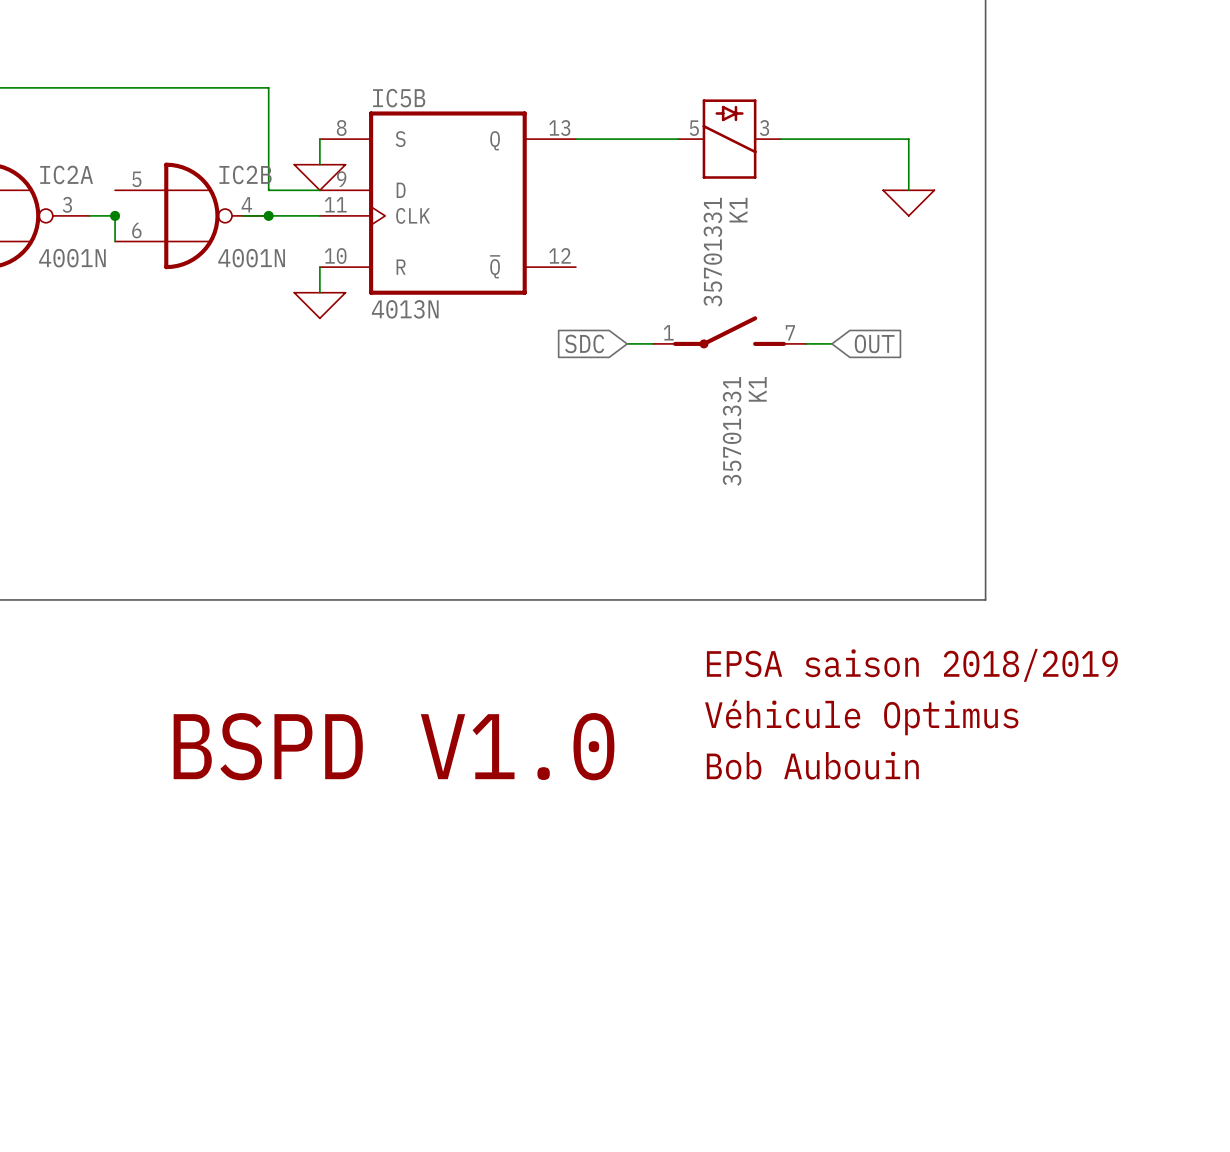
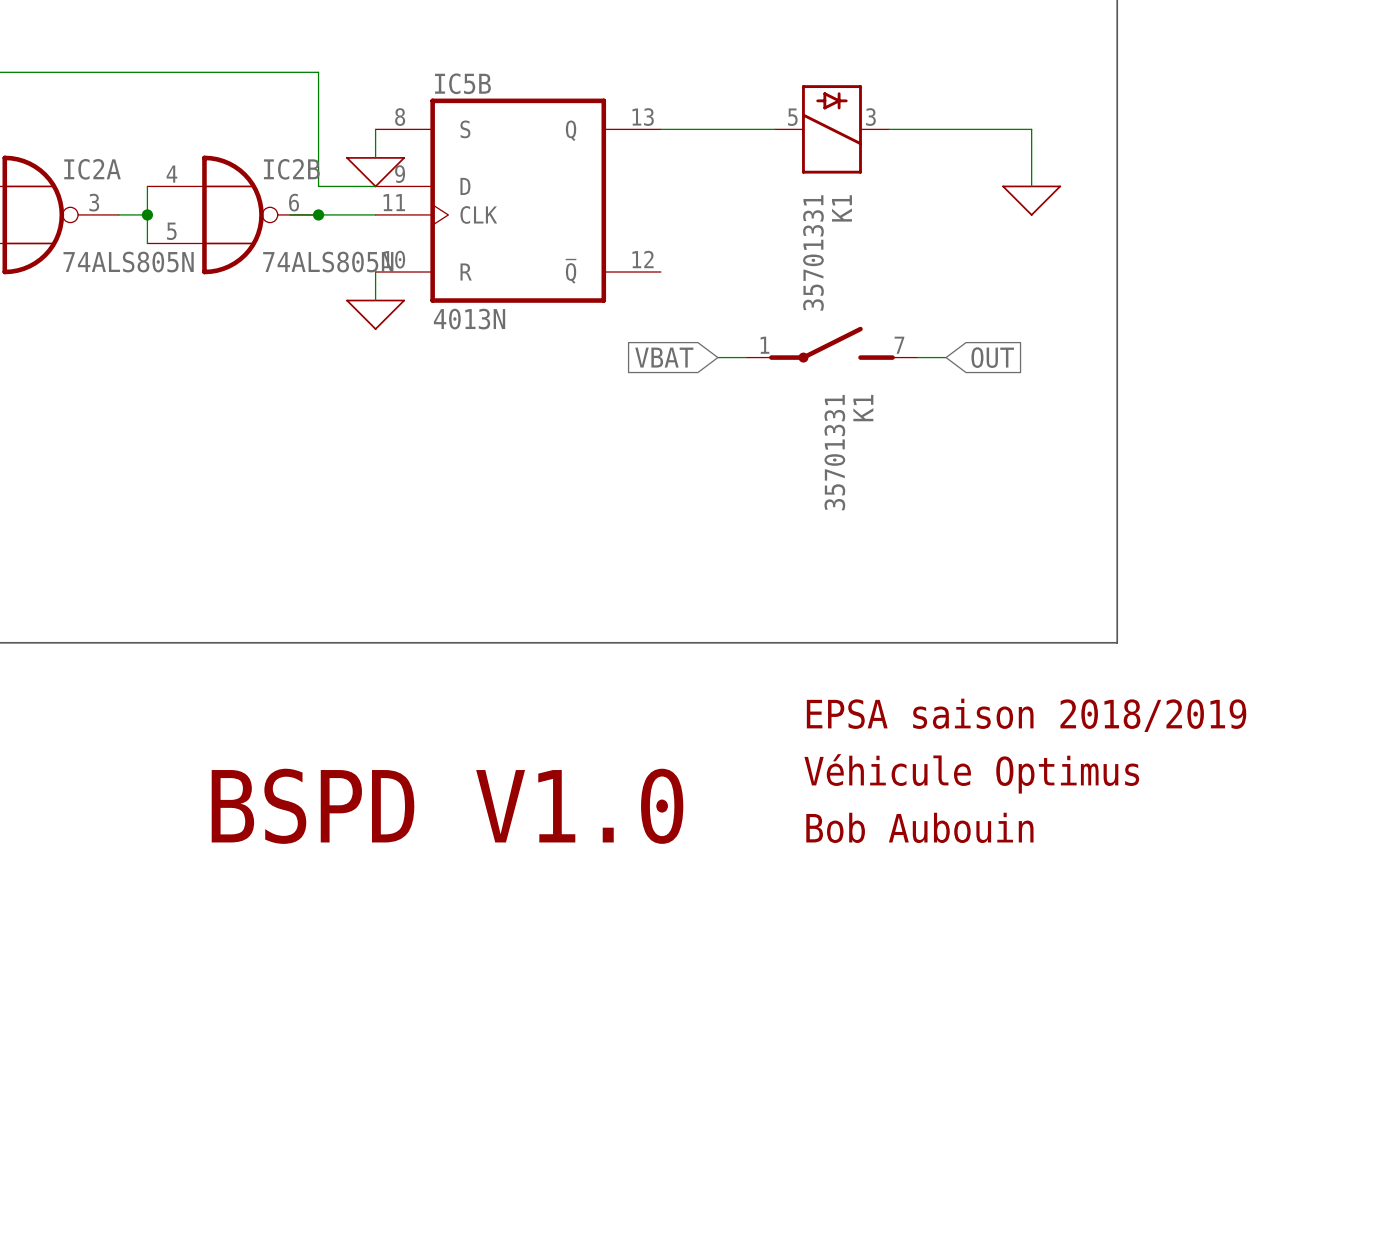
IC2B pin number: 5 (136, 179) -> 4 (171, 174)
wire: none -> (147, 186) (147, 214)
IC2B pin number: 4 (246, 204) -> 6 (294, 202)
IC2B pin number: 6 (136, 230) -> 5 (171, 231)
IC2A value: 4001N (72, 258) -> 74ALS805N (128, 262)
IC2B value: 4001N (251, 258) -> 74ALS805N (328, 262)
global label: SDC (584, 343) -> VBAT (664, 357)

